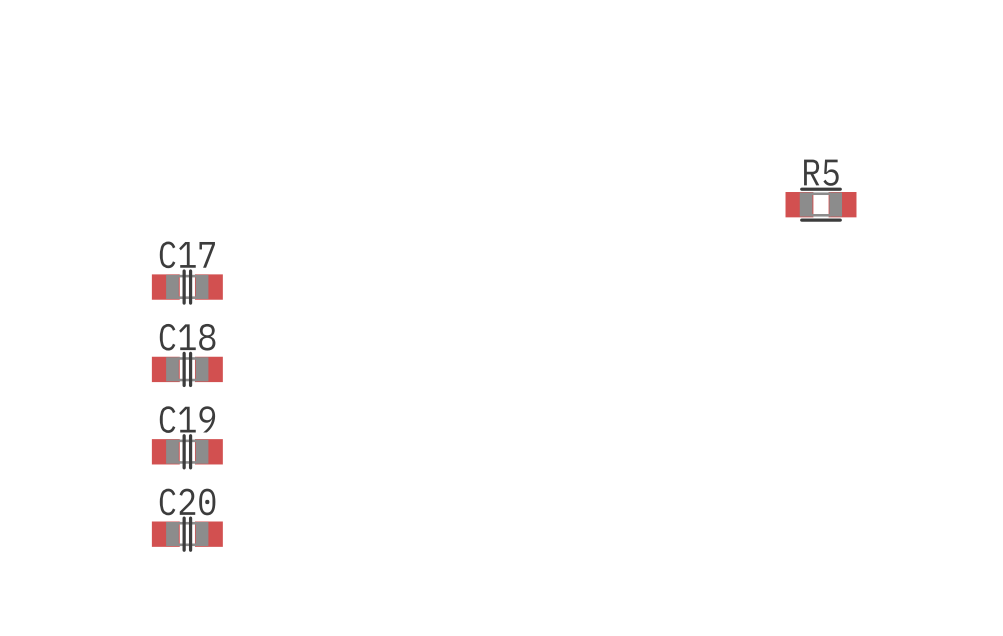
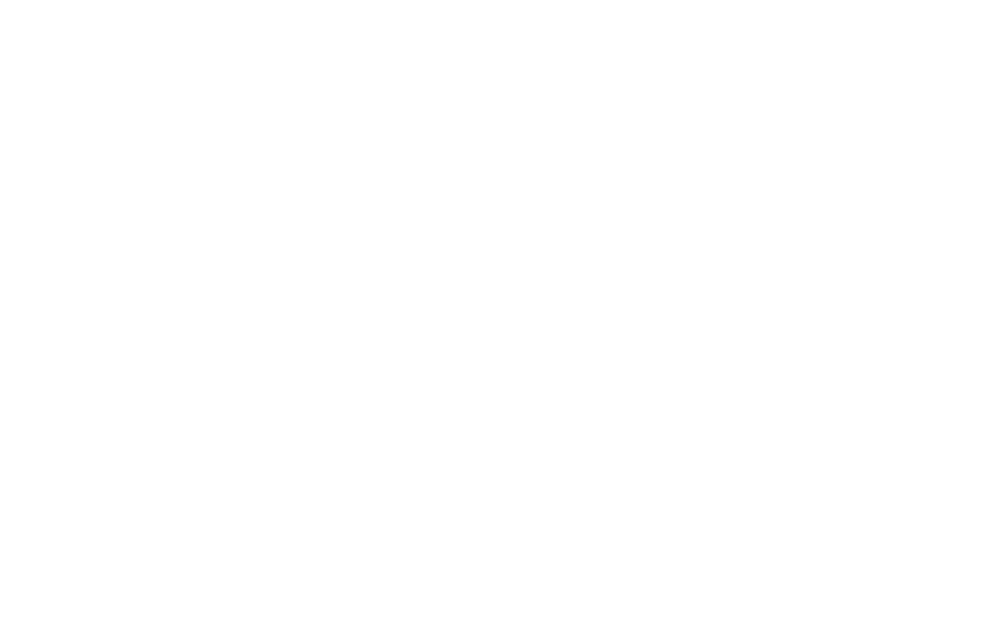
R5: (821, 204) -> none
C17: (187, 287) -> none
C18: (187, 369) -> none
C19: (187, 451) -> none
C20: (187, 534) -> none

